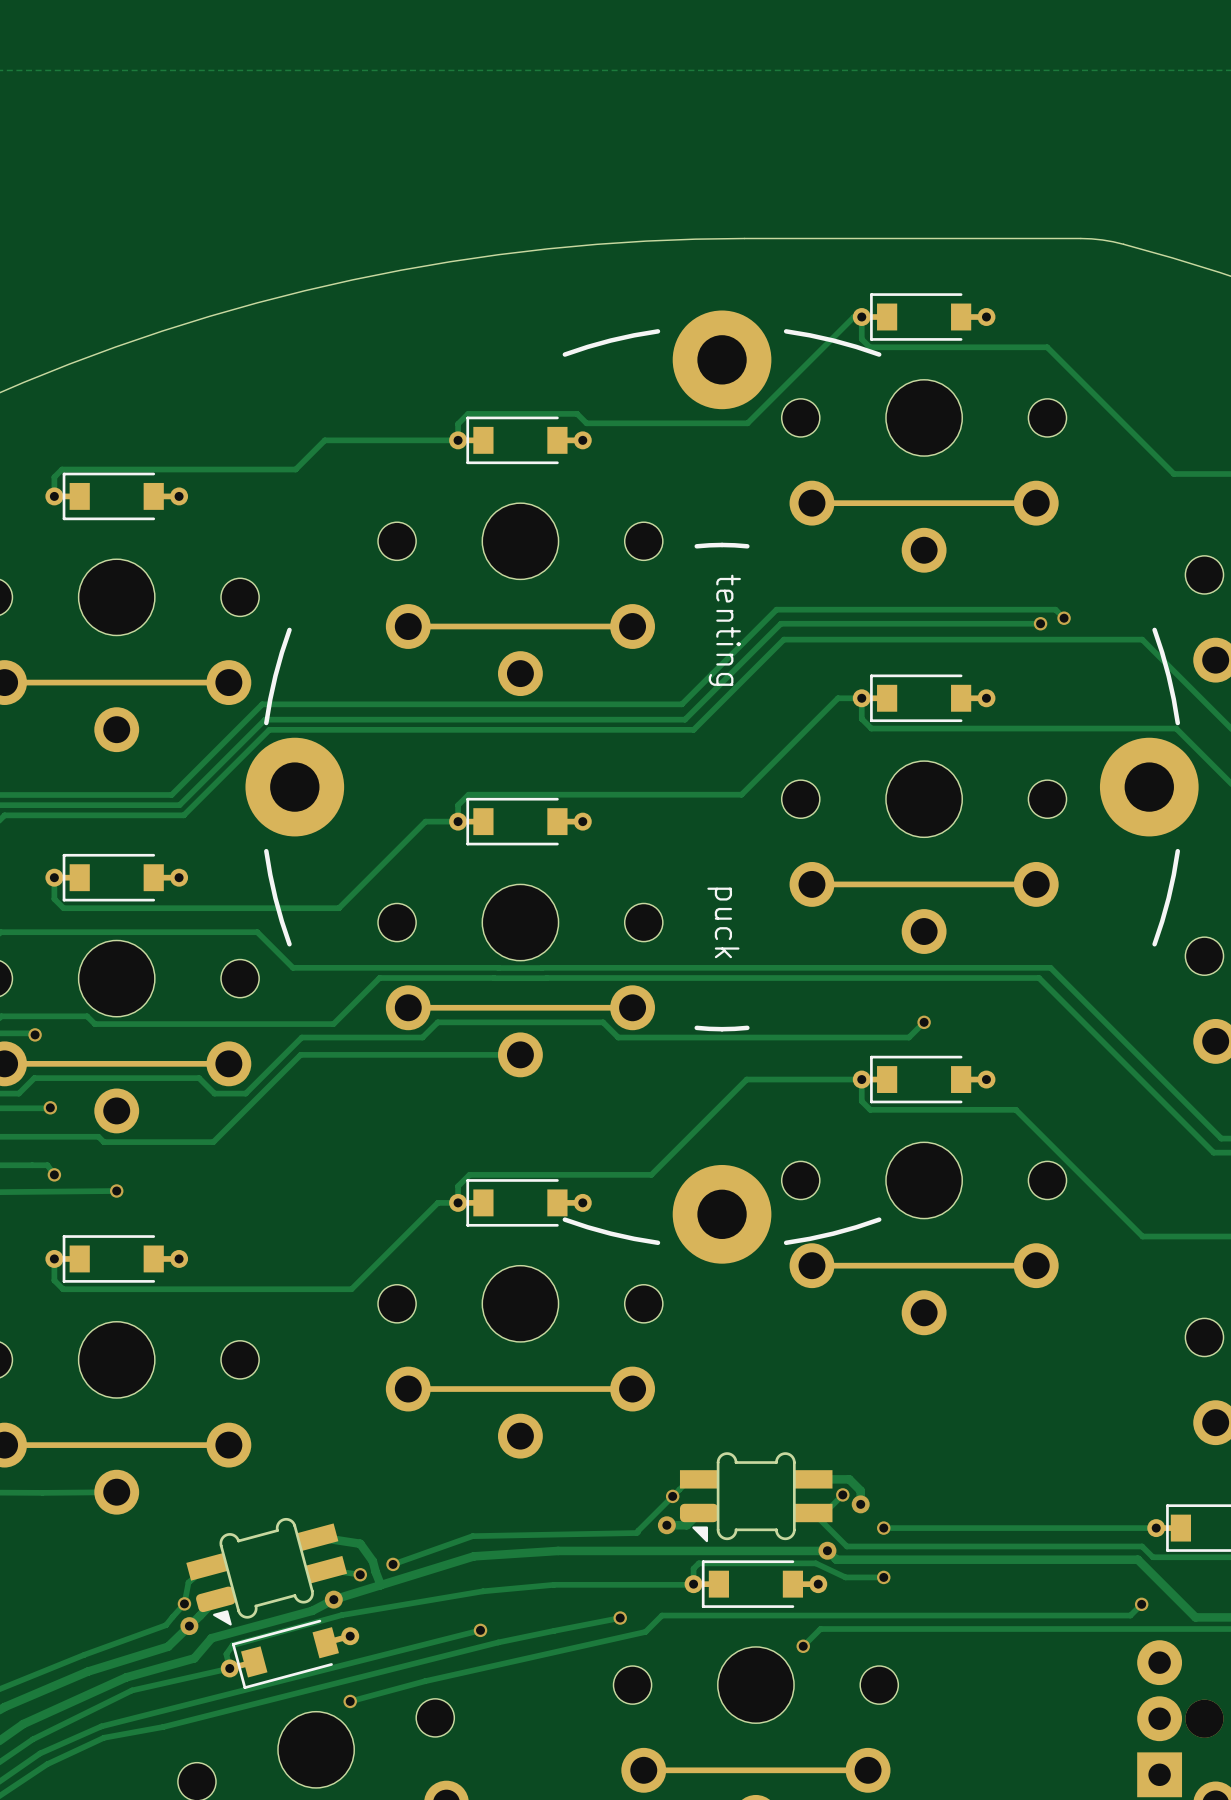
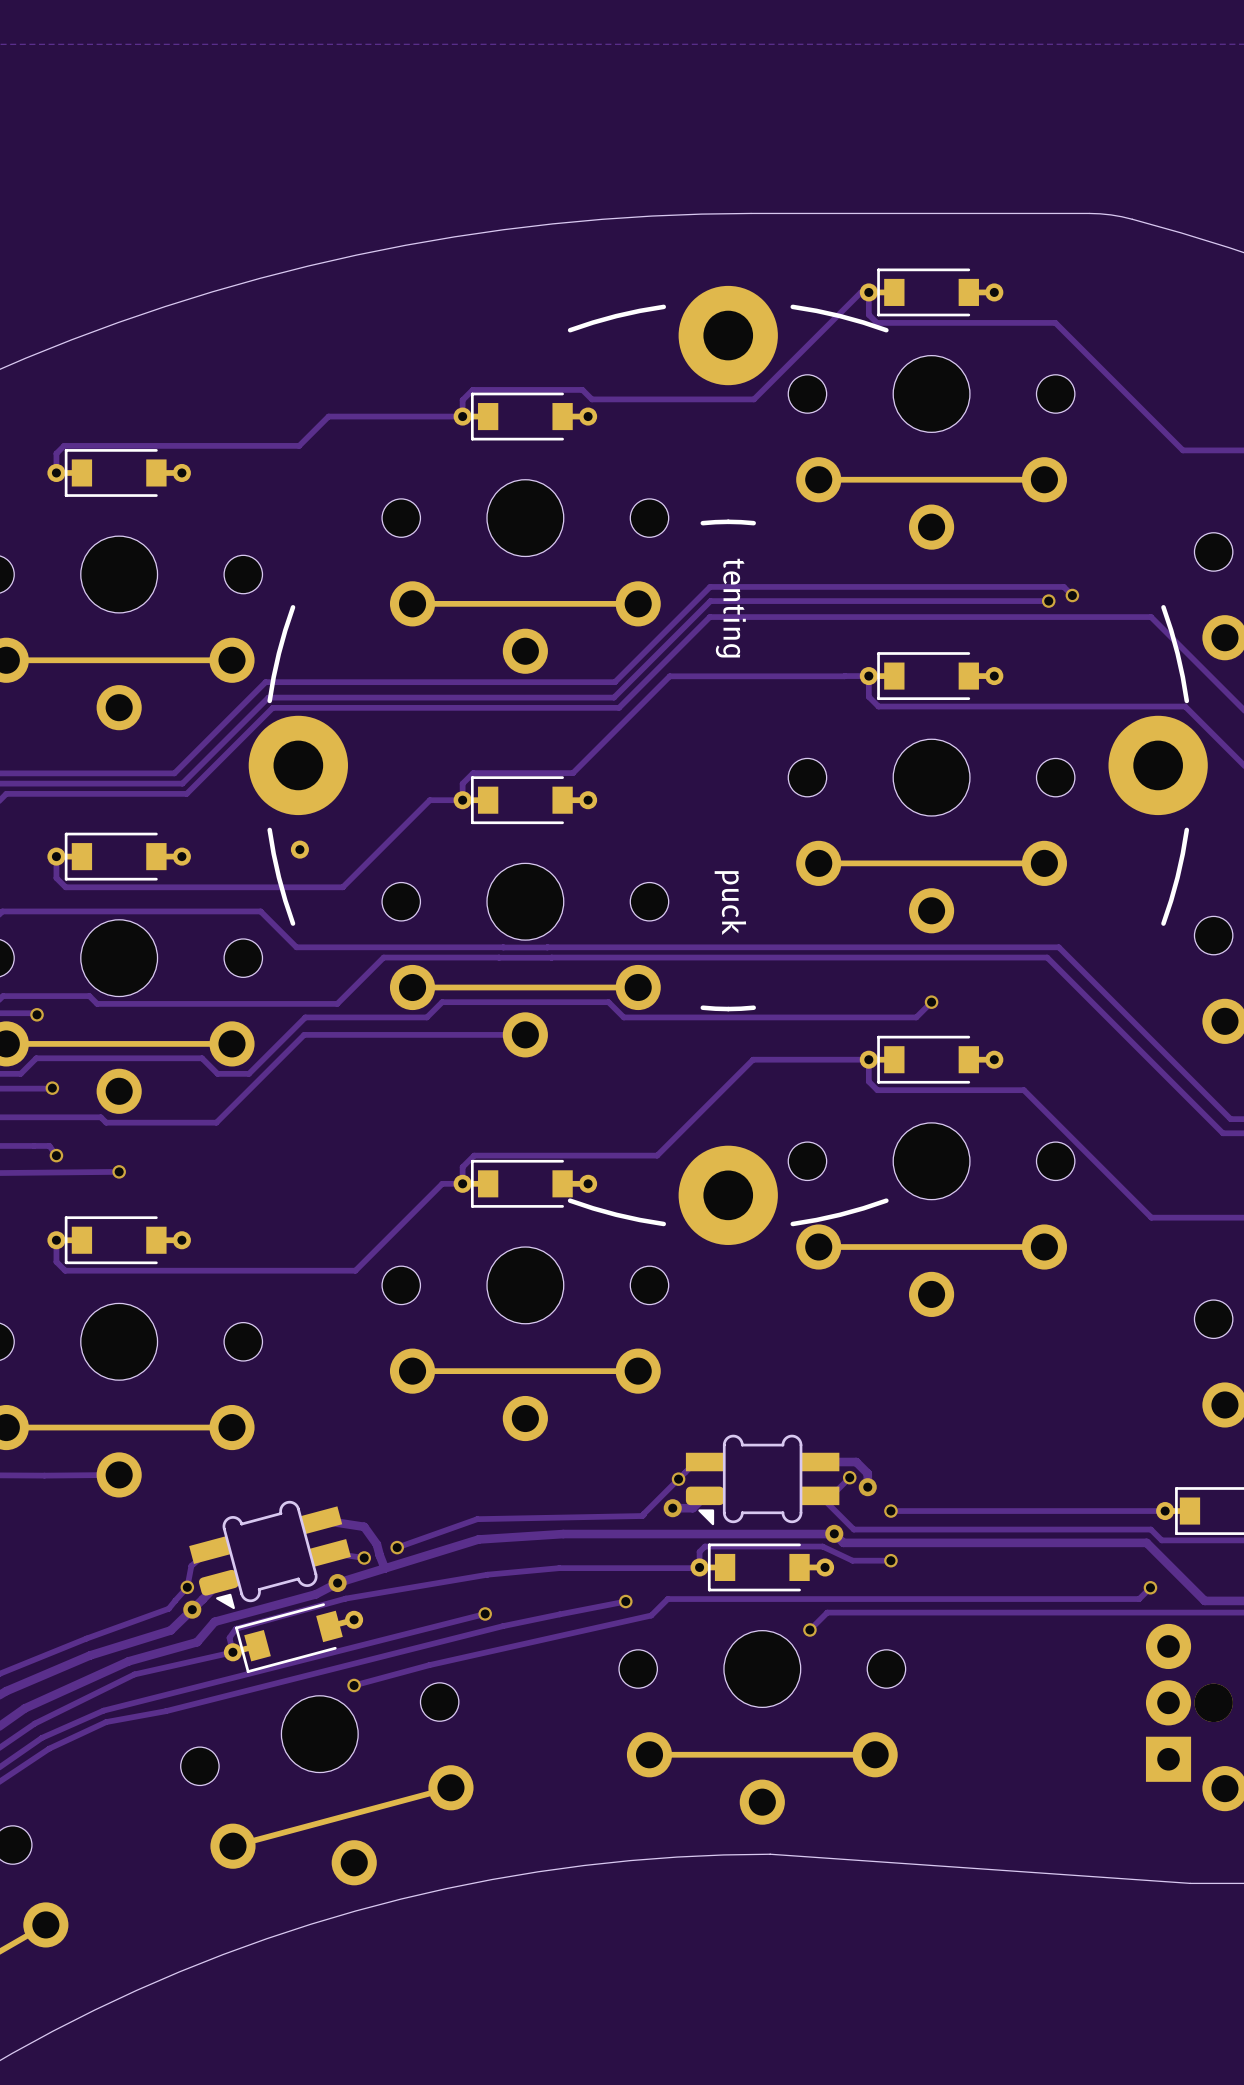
track: (776, 609) (681, 704) (609, 704) -> (783, 586) (710, 586) (614, 682)
track: (780, 623) (684, 719) (608, 719) -> (787, 601) (710, 601) (613, 697)
track: (783, 639) (693, 729) (613, 729) -> (790, 617) (709, 617) (619, 707)
track: (837, 698) (741, 794) (567, 794) -> (844, 676) (669, 676) (572, 773)
part: none -> (299, 849)

